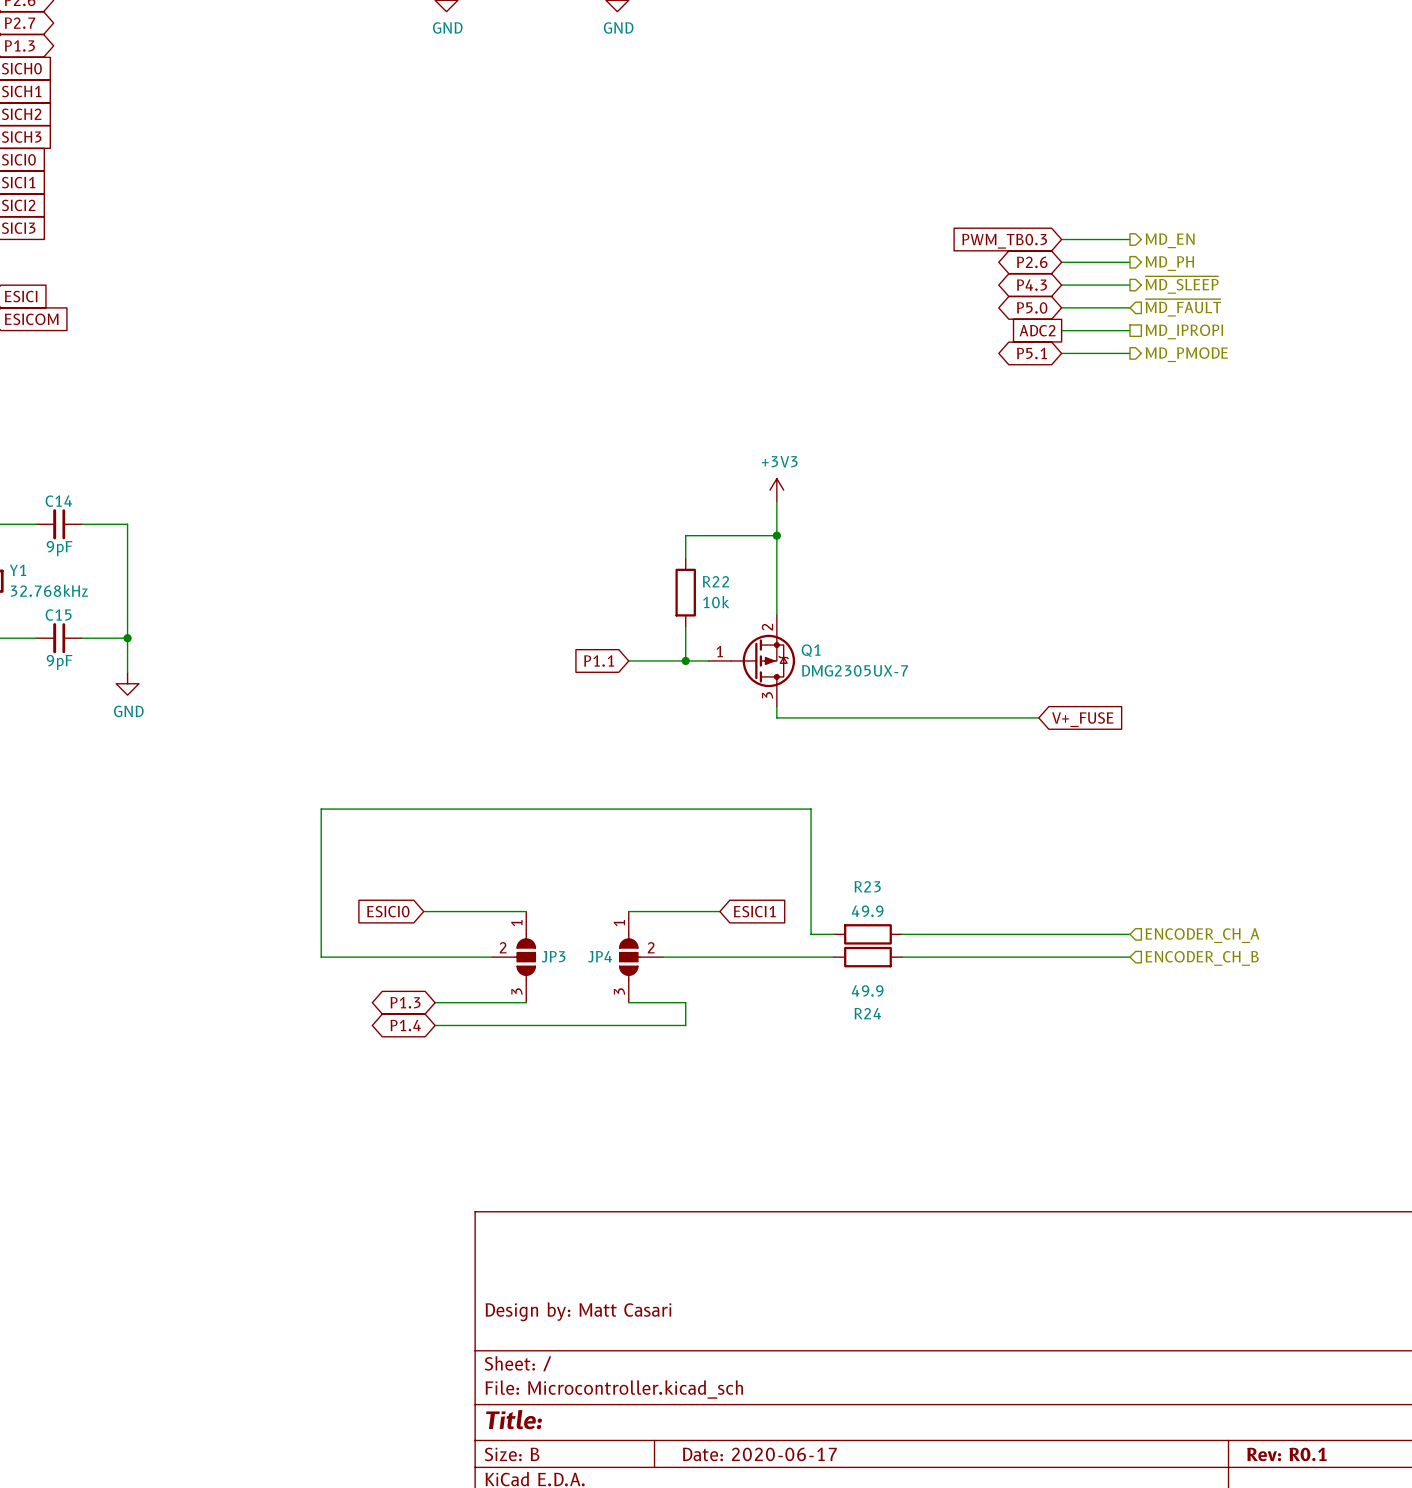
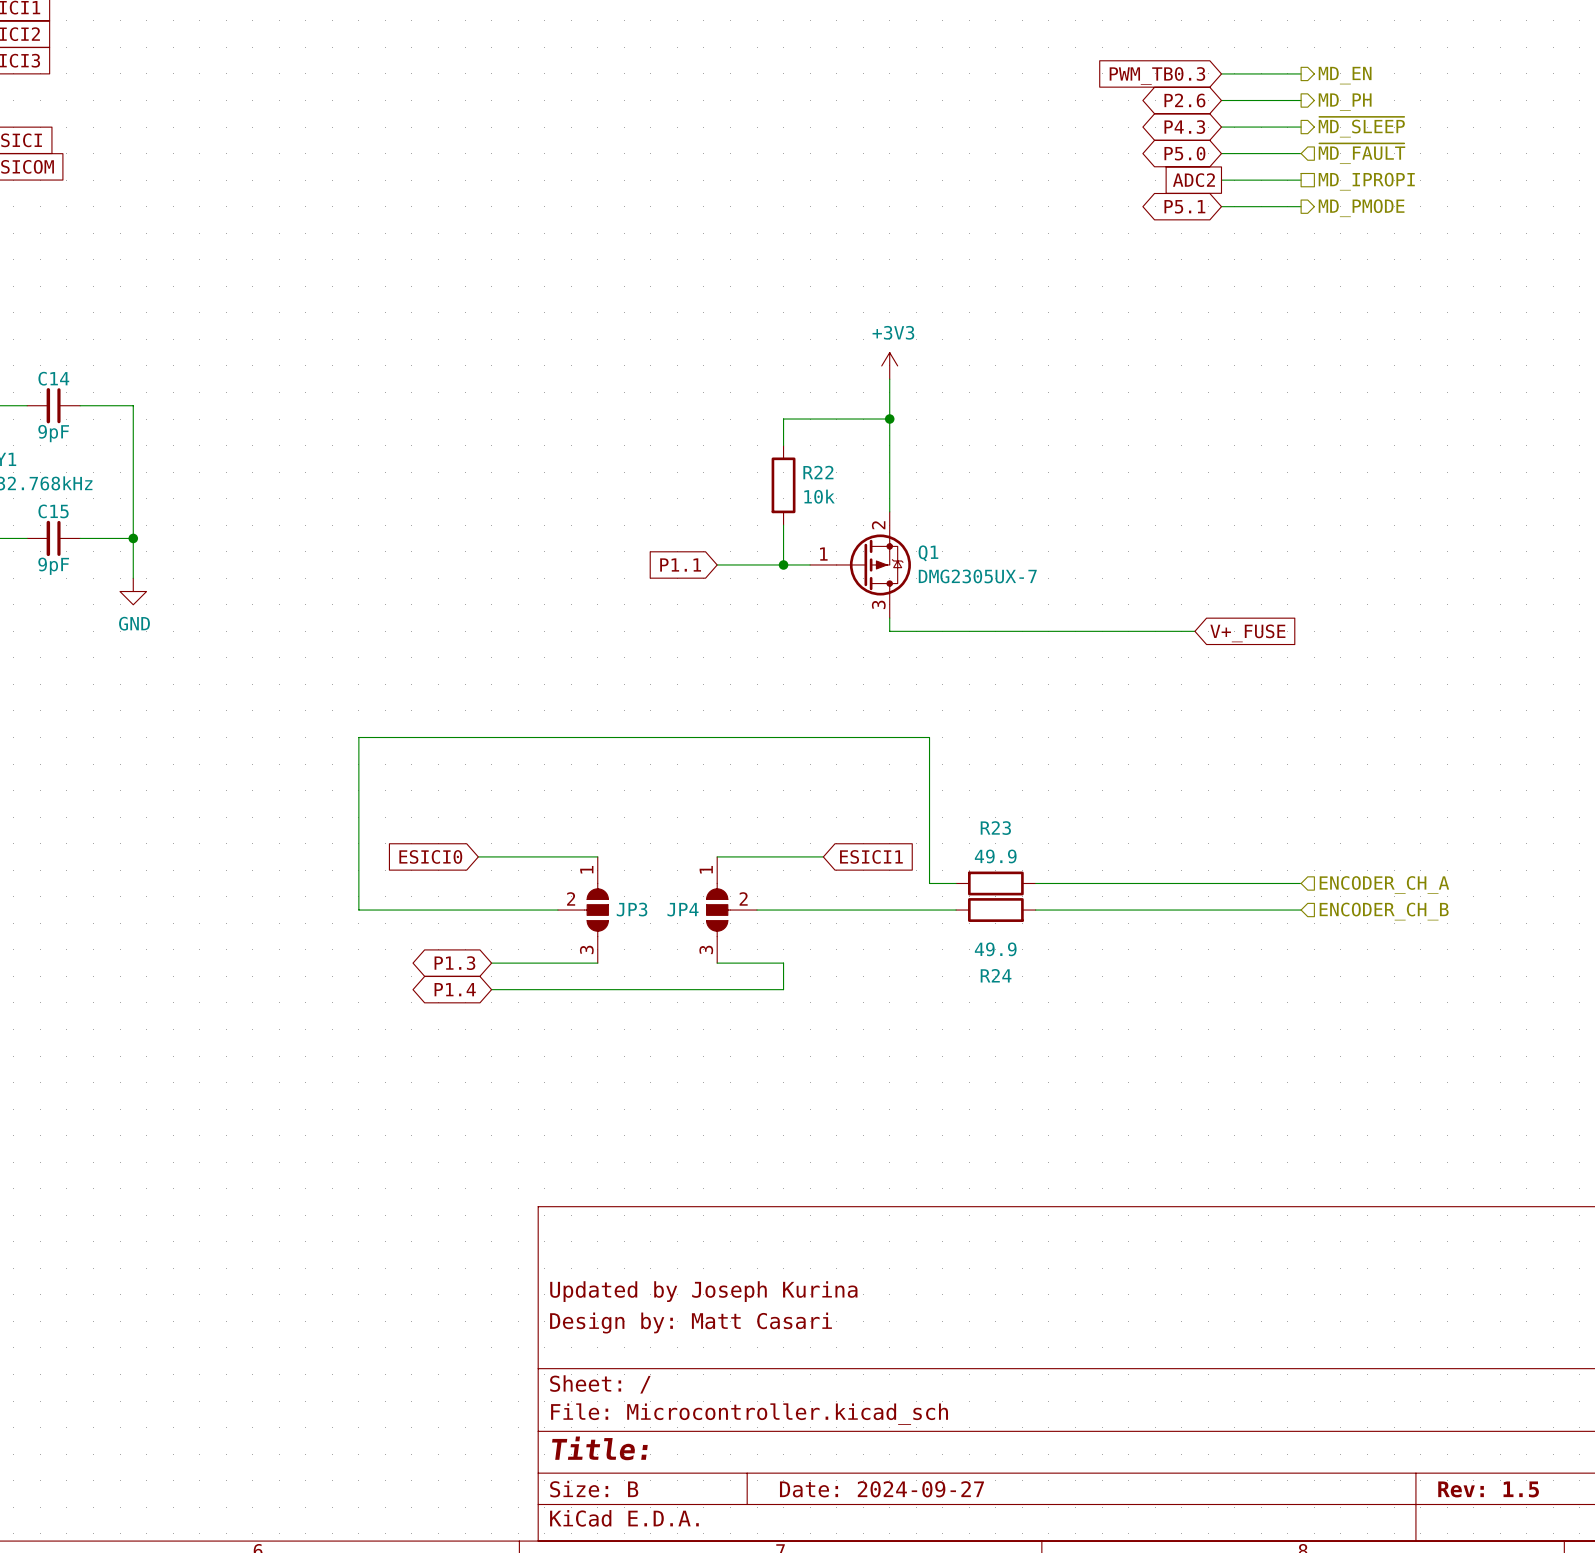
title block: none -> Updated by Joseph Kurina (703, 1291)
title block: Date: 2020-06-17 (759, 1454) -> Date: 2024-09-27 (881, 1489)
title block: Rev: R0.1 (1286, 1454) -> Rev: 1.5 (1488, 1489)

